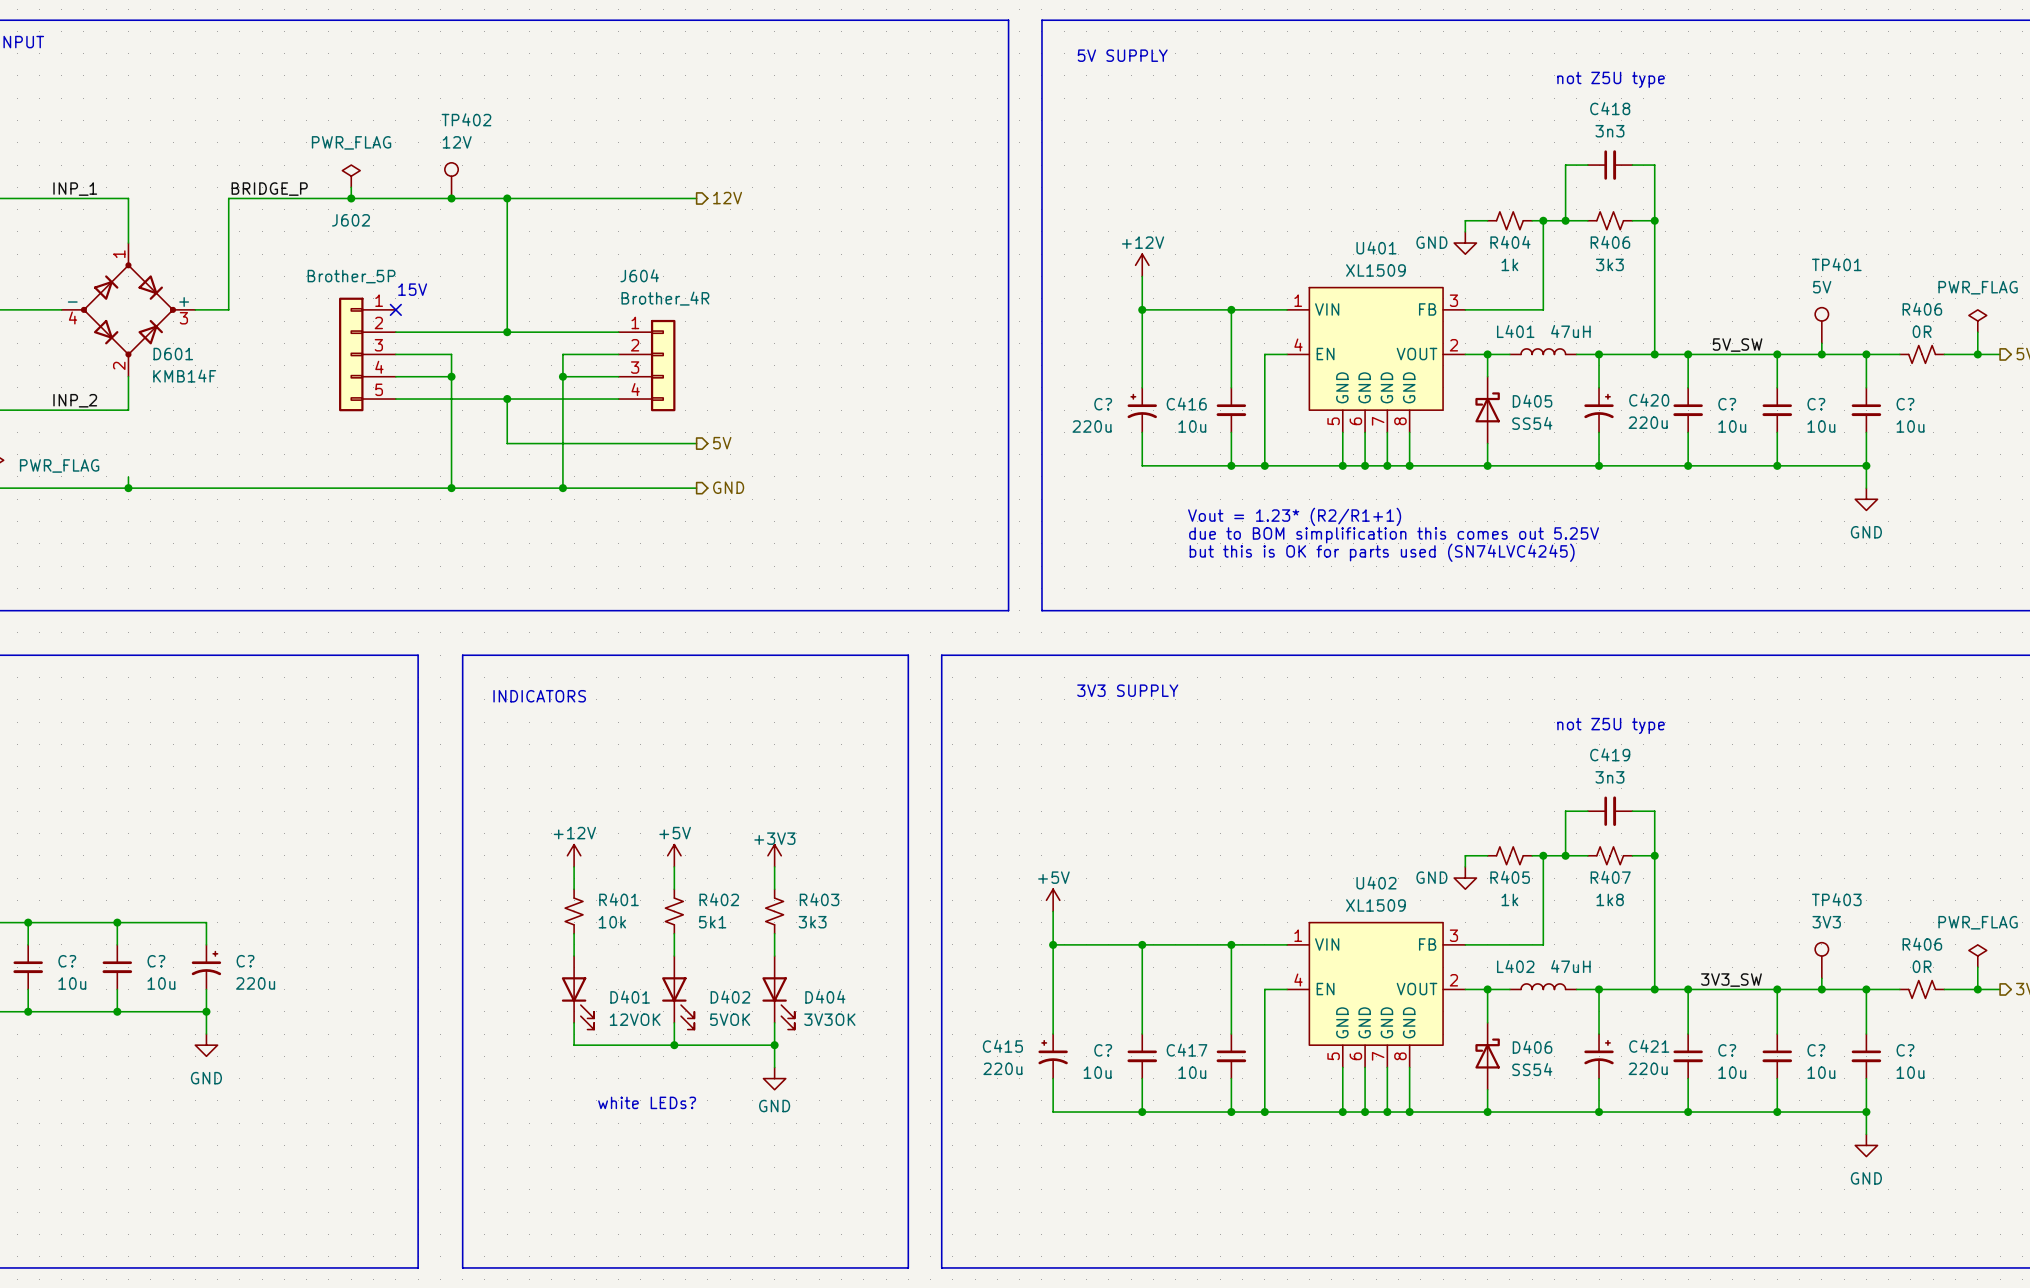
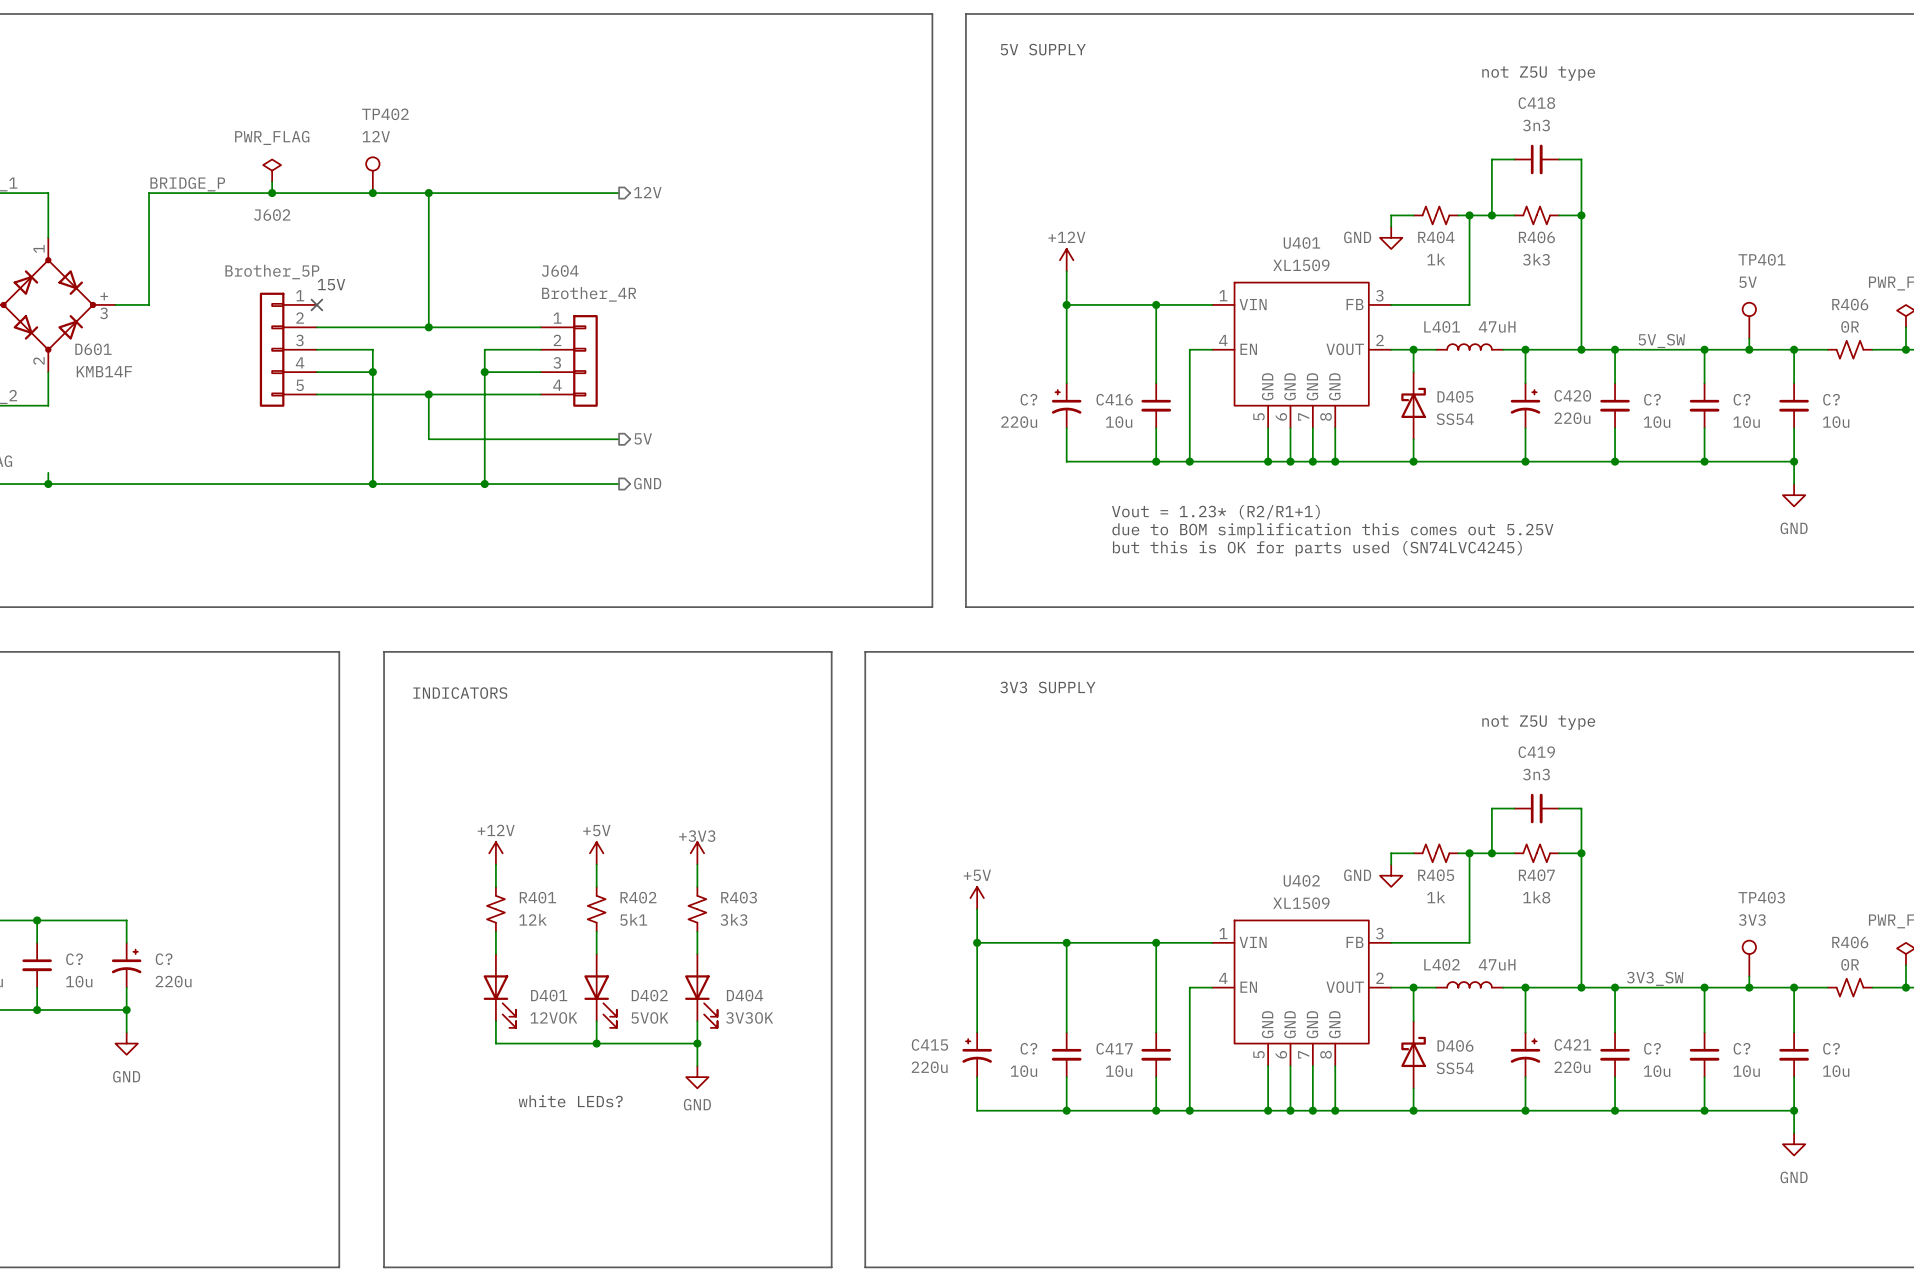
R401 value: 10k (612, 922) -> 12k (532, 919)

